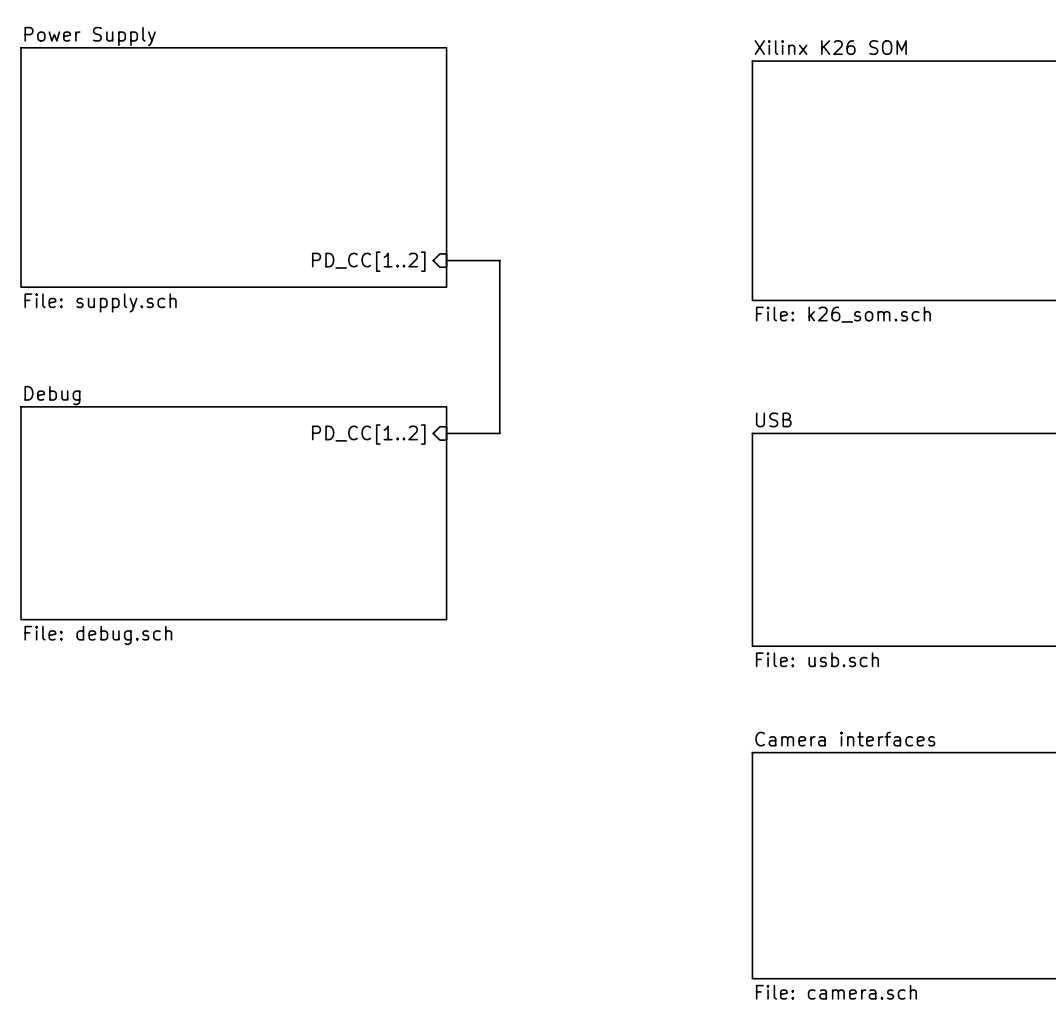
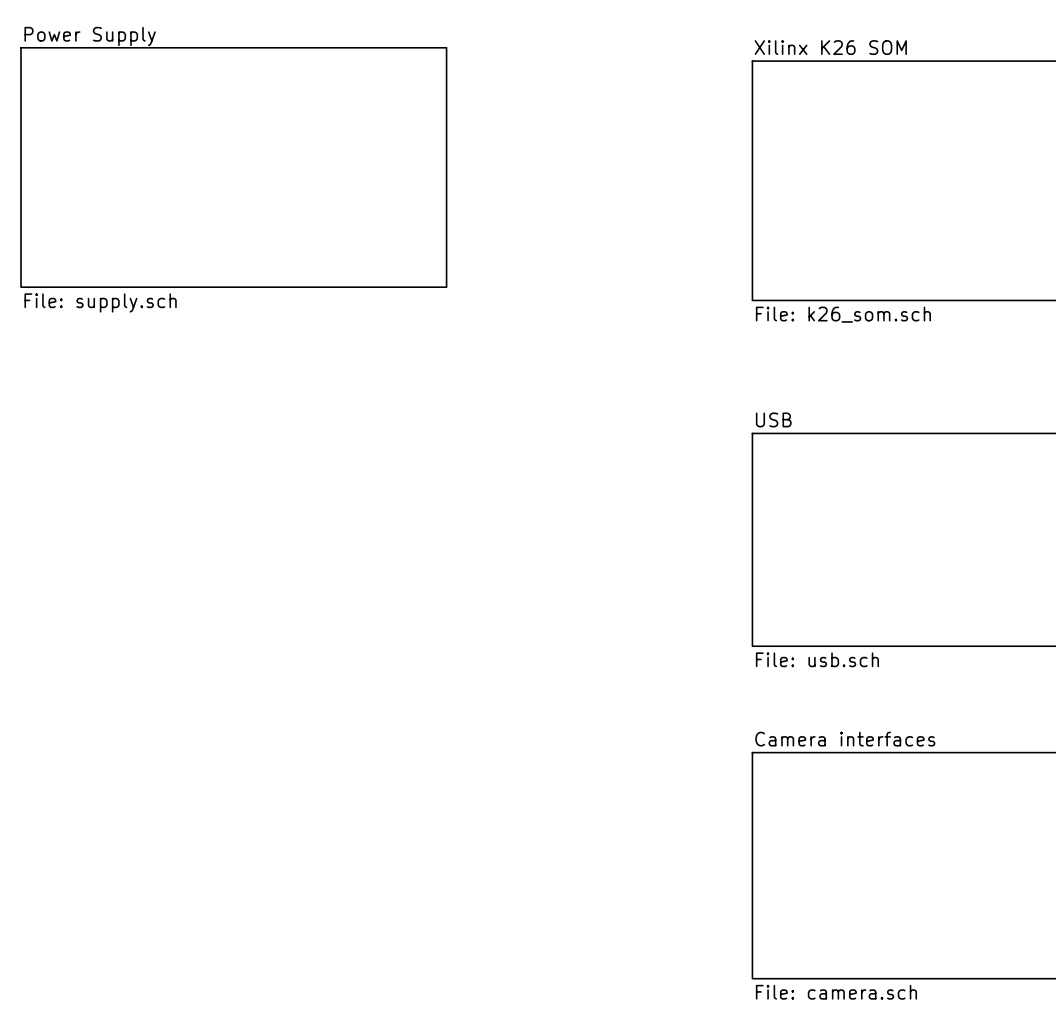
bus: (446, 260) (499, 260) (499, 433) (446, 433) -> none
sheet pin: PD_CC[1..2] (368, 261) -> none
sheet pin: PD_CC[1..2] (368, 434) -> none
sheet Debug: File: debug.sch (233, 513) -> none

